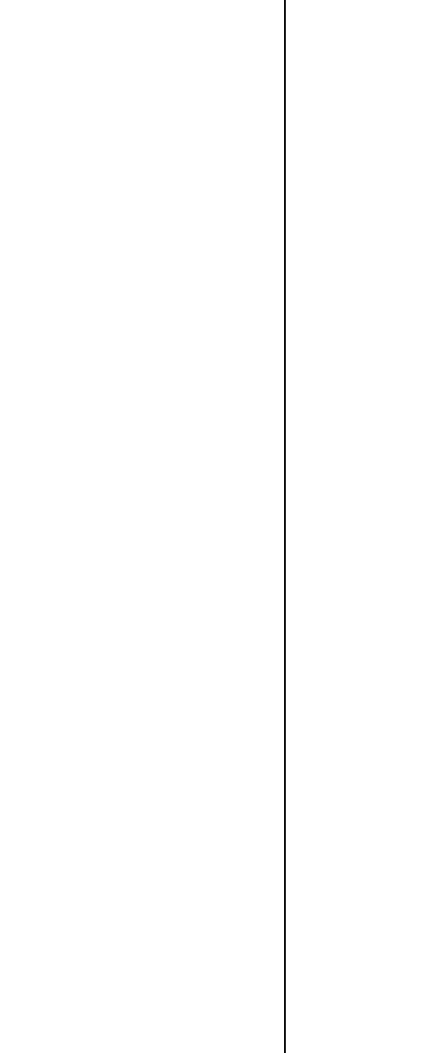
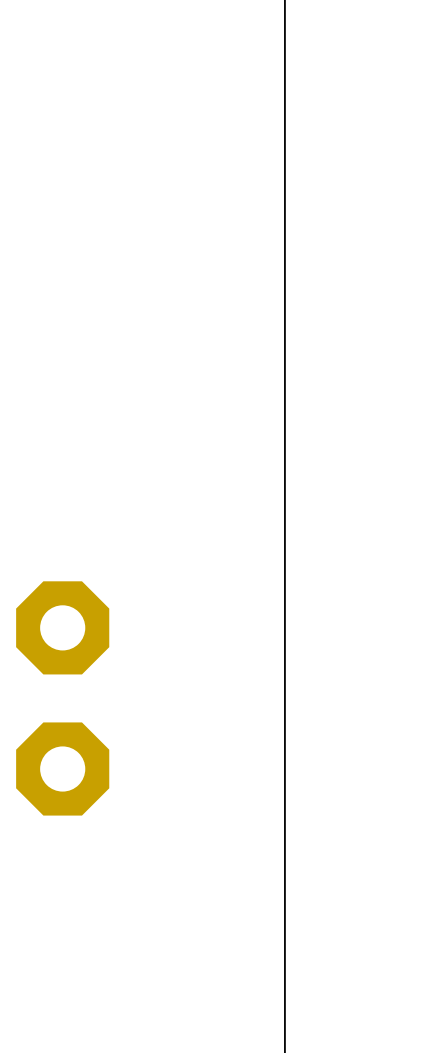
part: none -> (62, 698)

